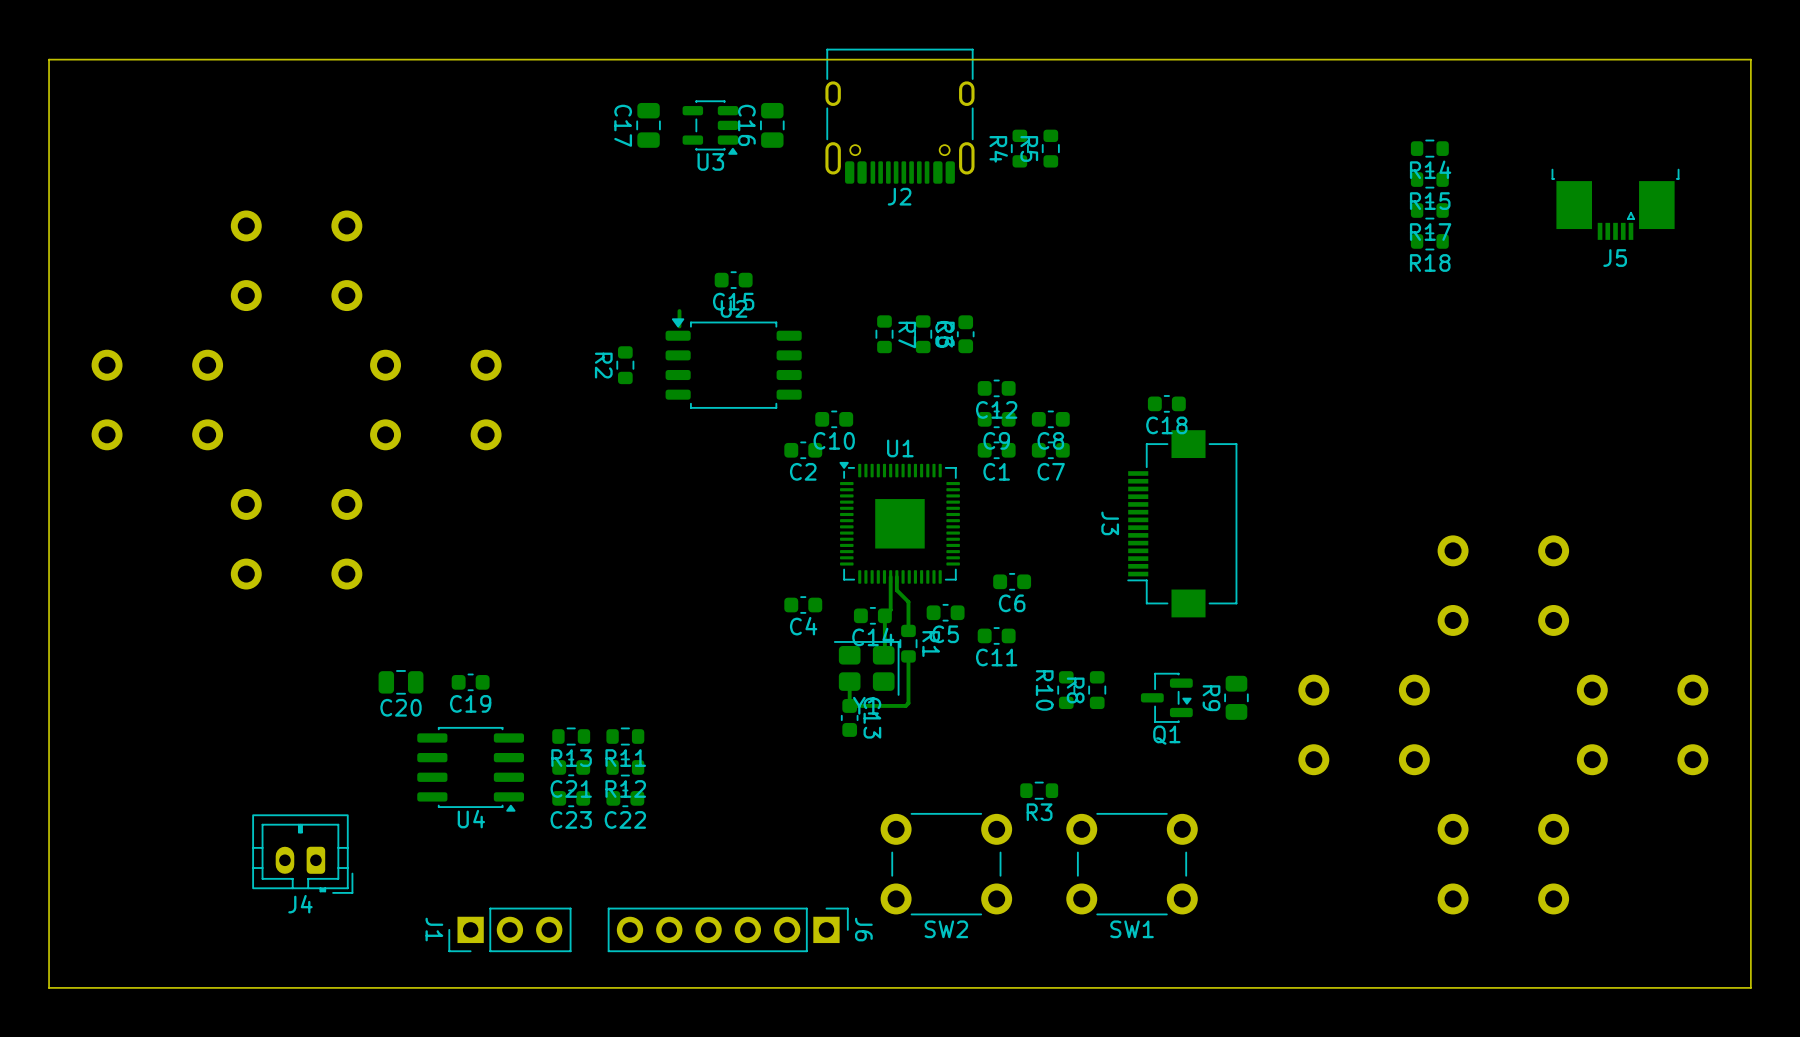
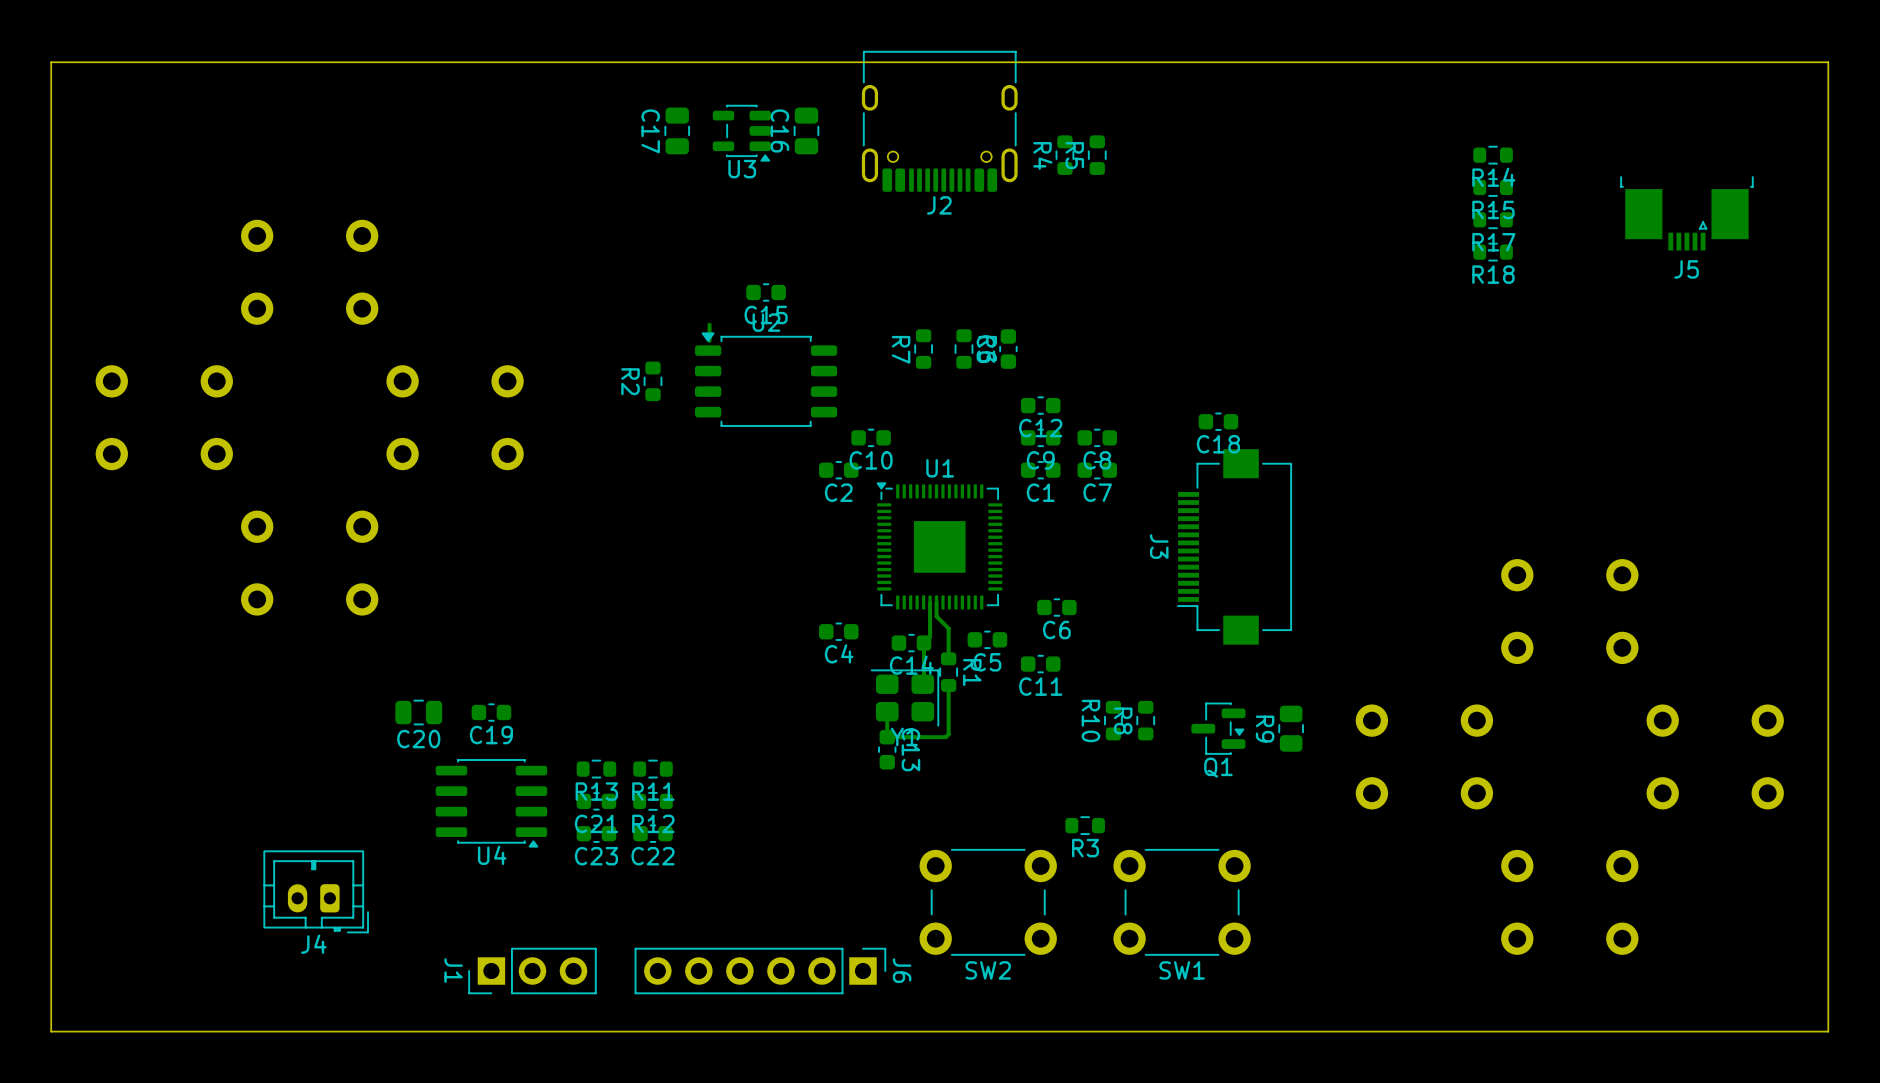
R7 name position: R7 (907, 334) -> R7 (901, 349)

